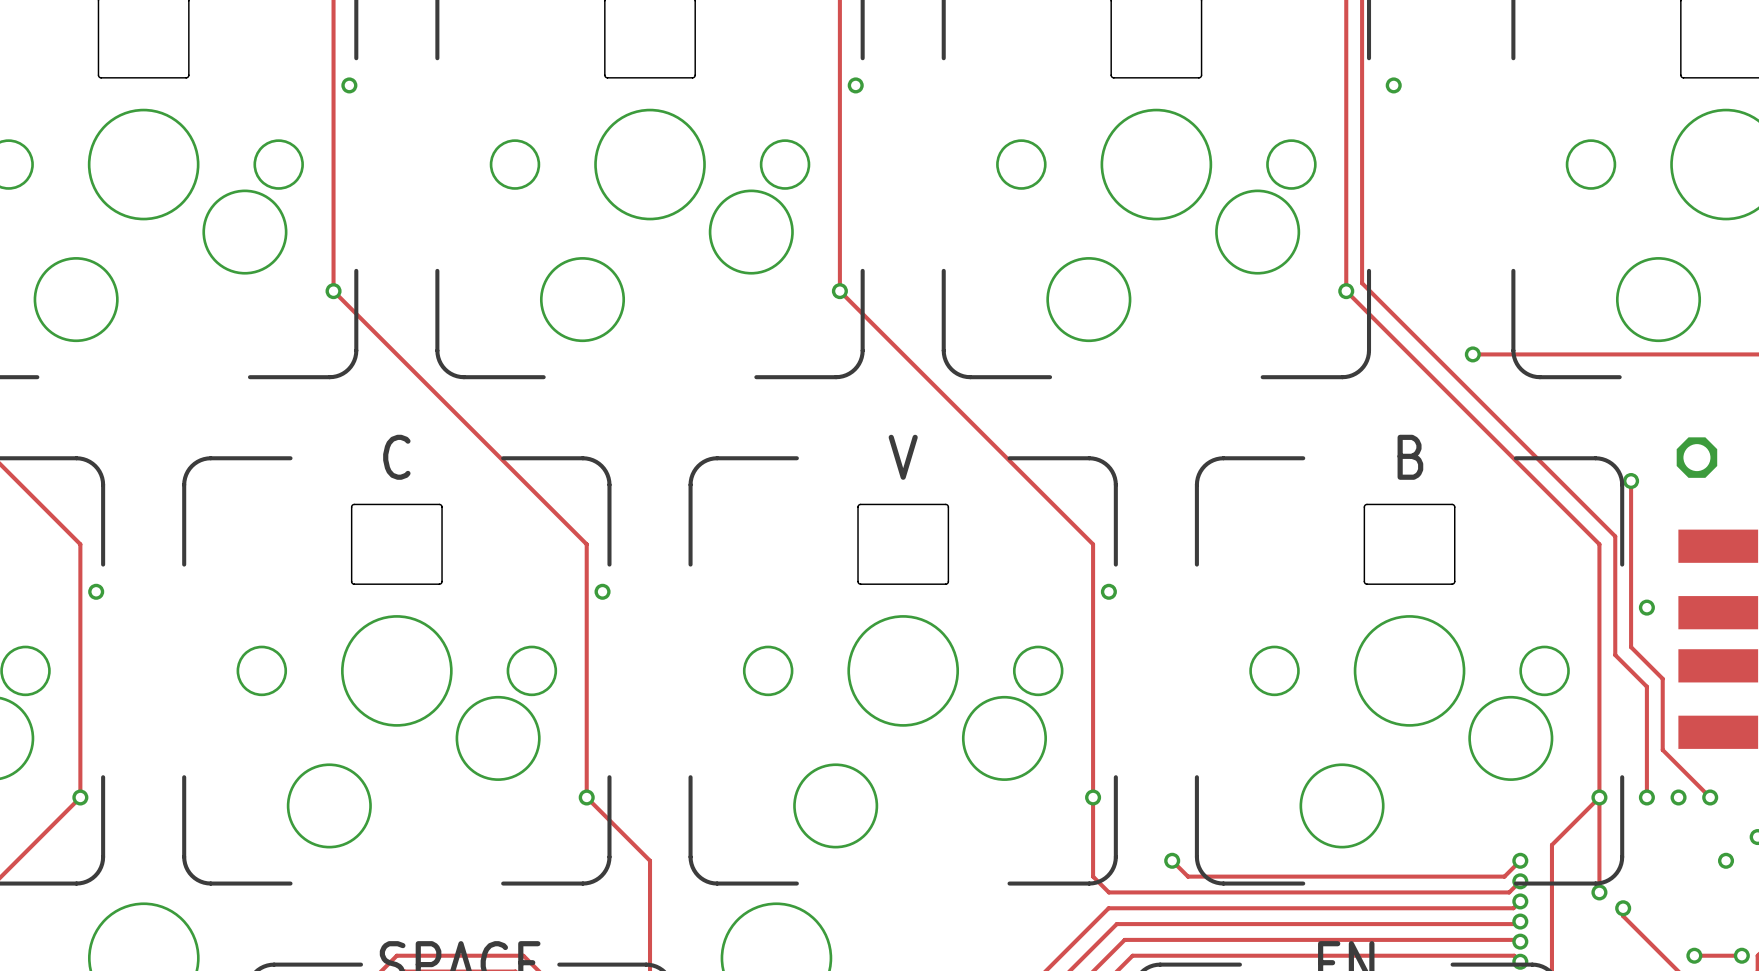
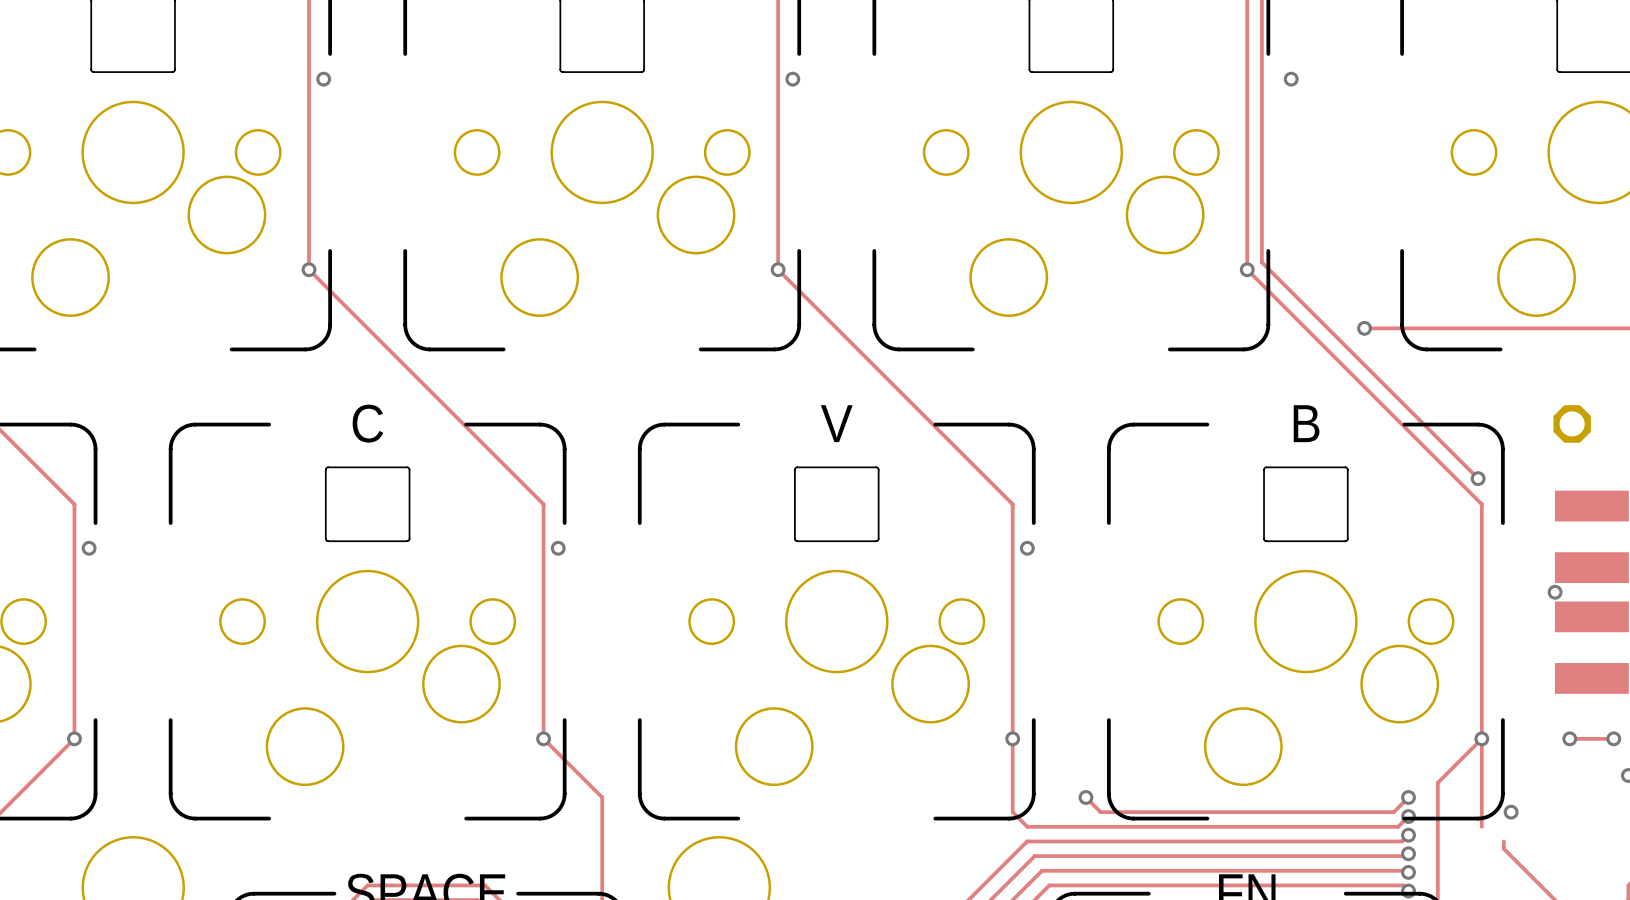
track: (1631, 481) (1631, 647) (1662, 678) (1662, 750) (1710, 797) -> none
via position: (1631, 481) -> (1478, 478)
track: (1595, 516) (1615, 536) (1615, 655) (1646, 686) (1646, 797) -> none
via position: (1646, 607) -> (1555, 592)
via: (1646, 797) -> none
via: (1678, 797) -> none
via: none -> (1569, 738)
via: (1710, 797) -> none
via: none -> (1613, 738)
via: (1726, 860) -> none
via: none -> (1511, 812)
via: (1599, 892) -> none
via: (1623, 908) -> none
track: (1694, 955) (1741, 955) -> (1569, 738) (1613, 738)
via: (1694, 955) -> none
via: (1741, 955) -> none

